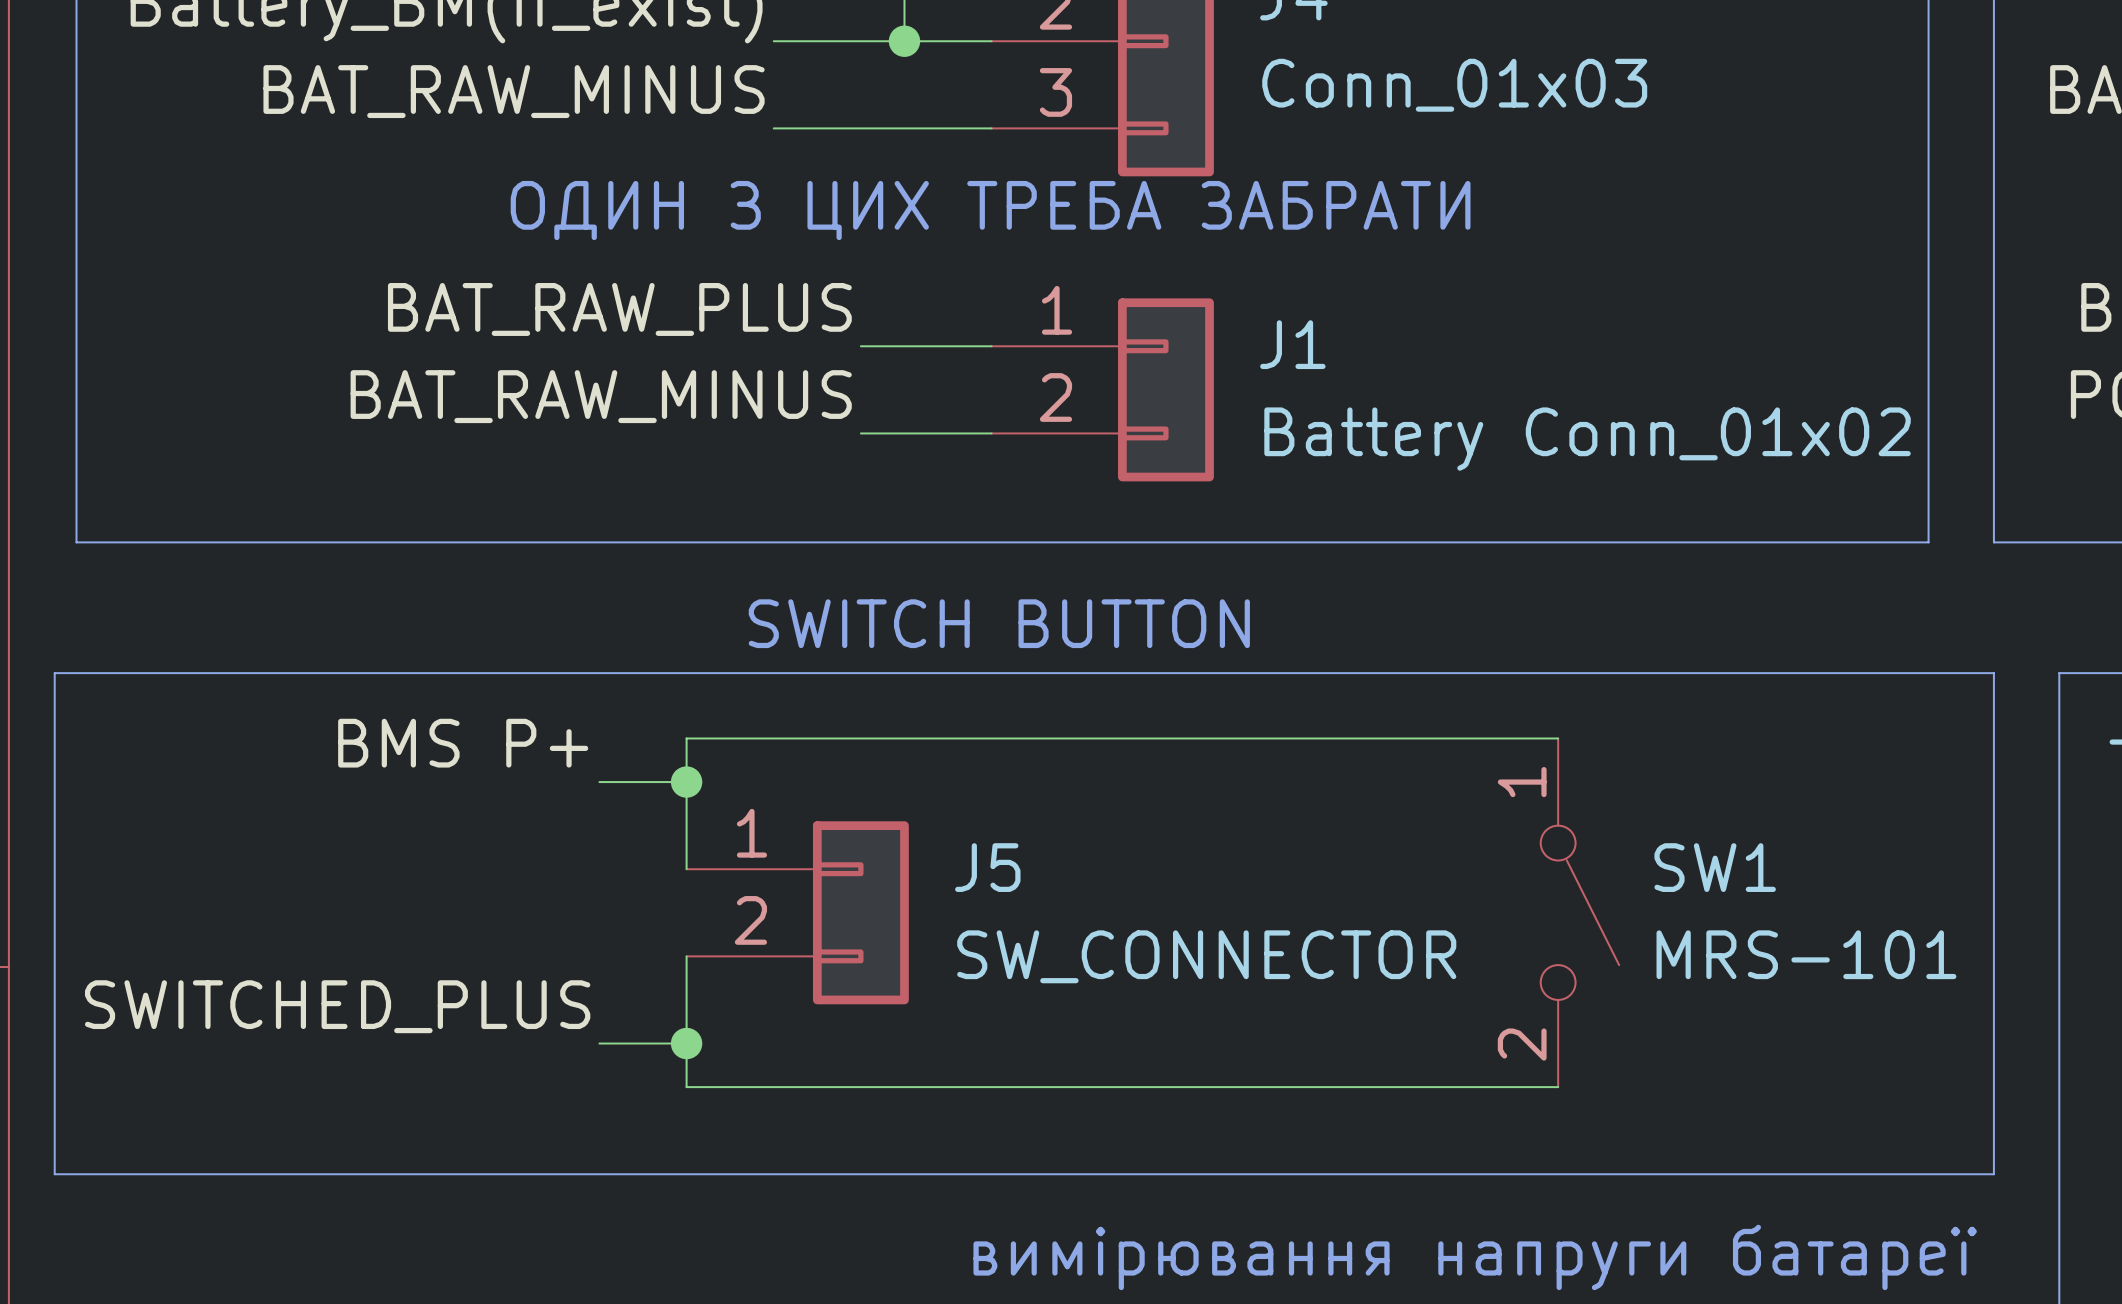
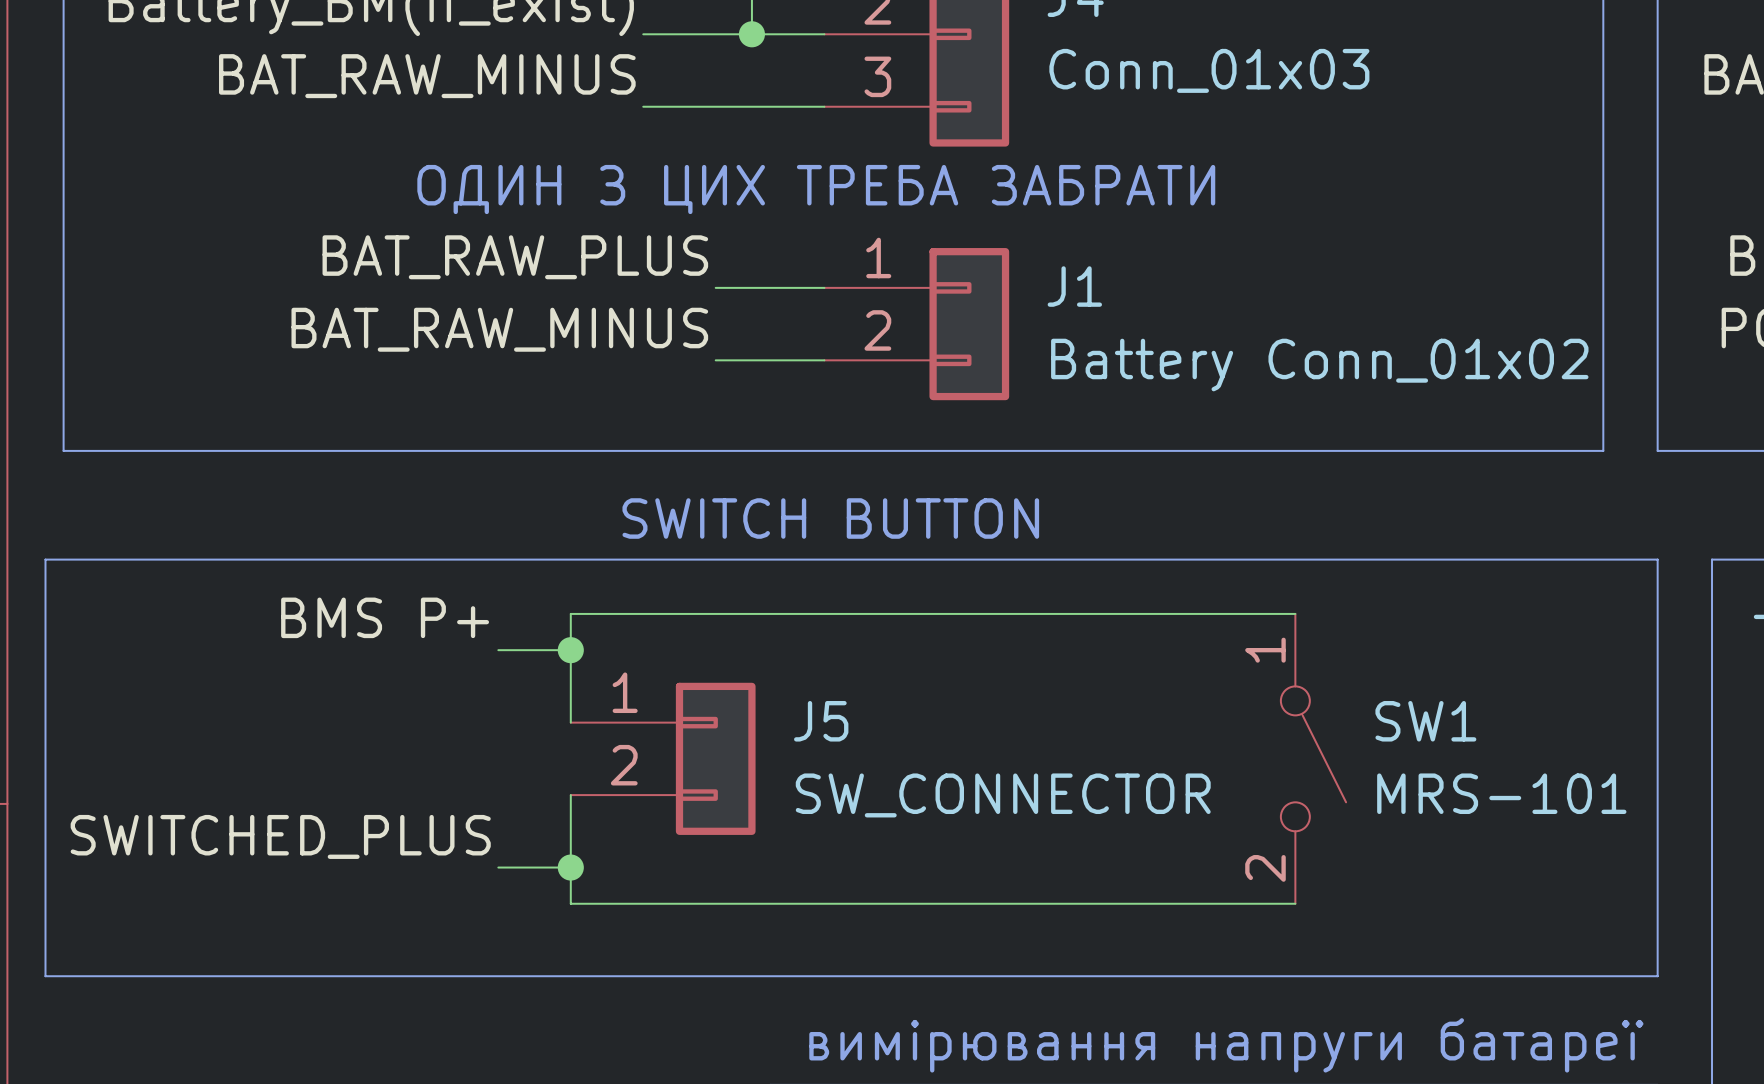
text position: ОДИН З ЦИХ ТРЕБА ЗАБРАТИ (990, 210) -> ОДИН З ЦИХ ТРЕБА ЗАБРАТИ (816, 189)

